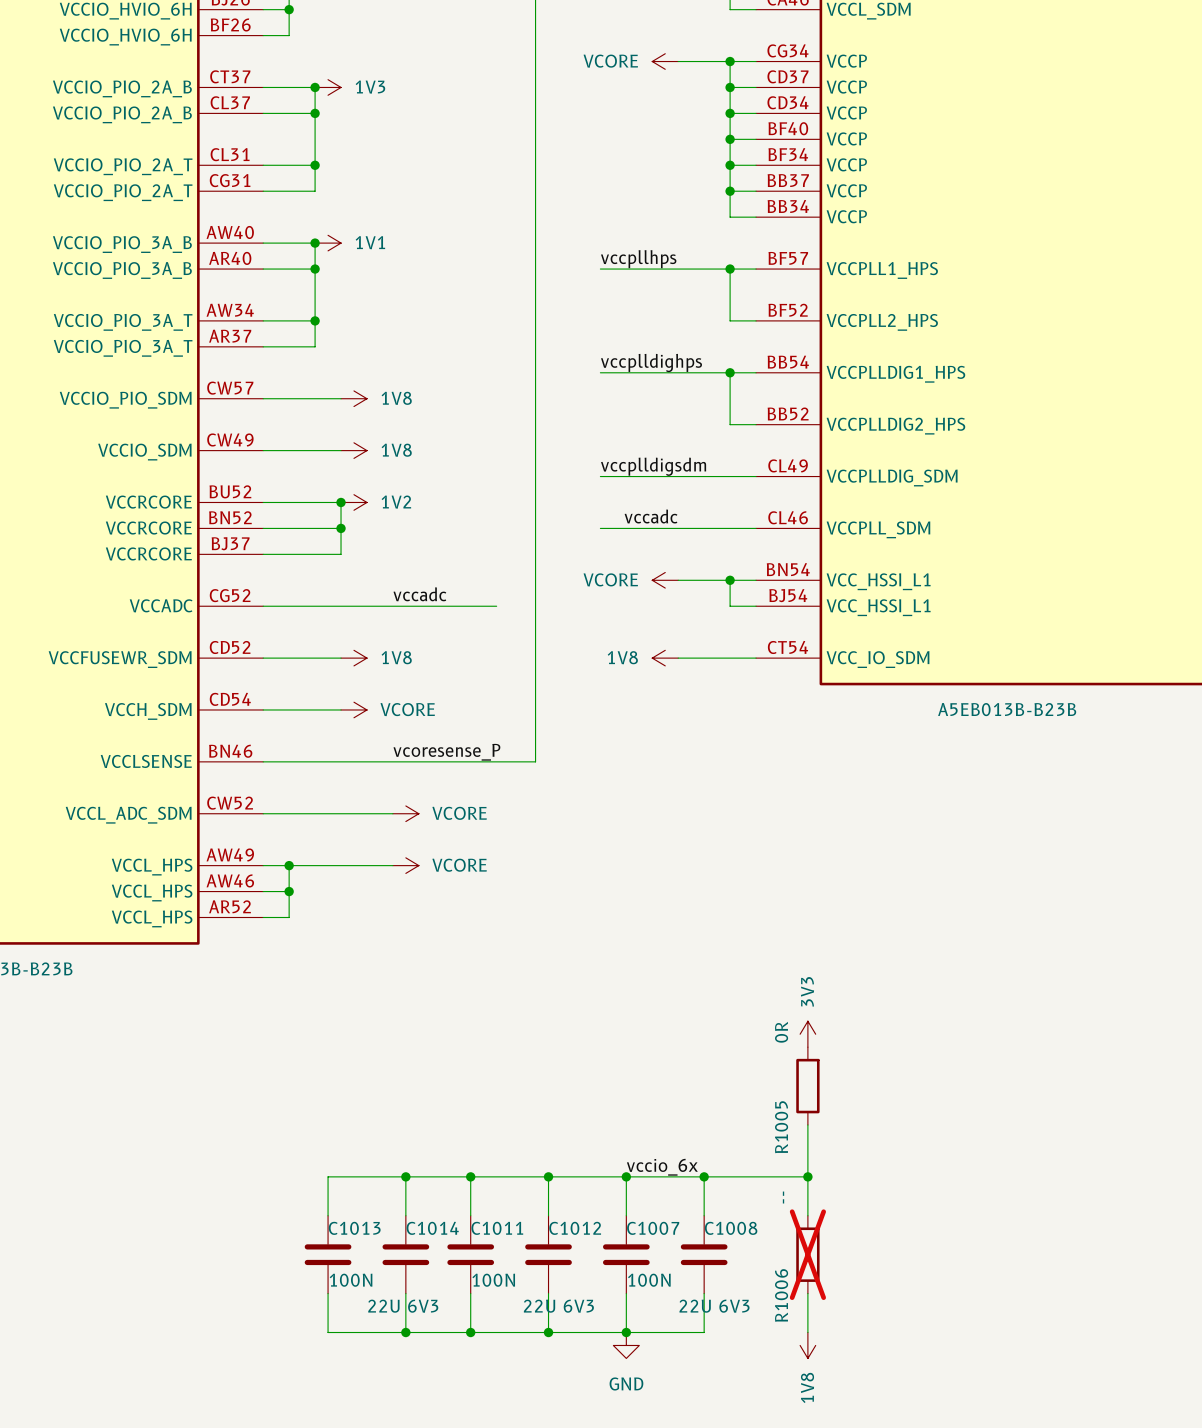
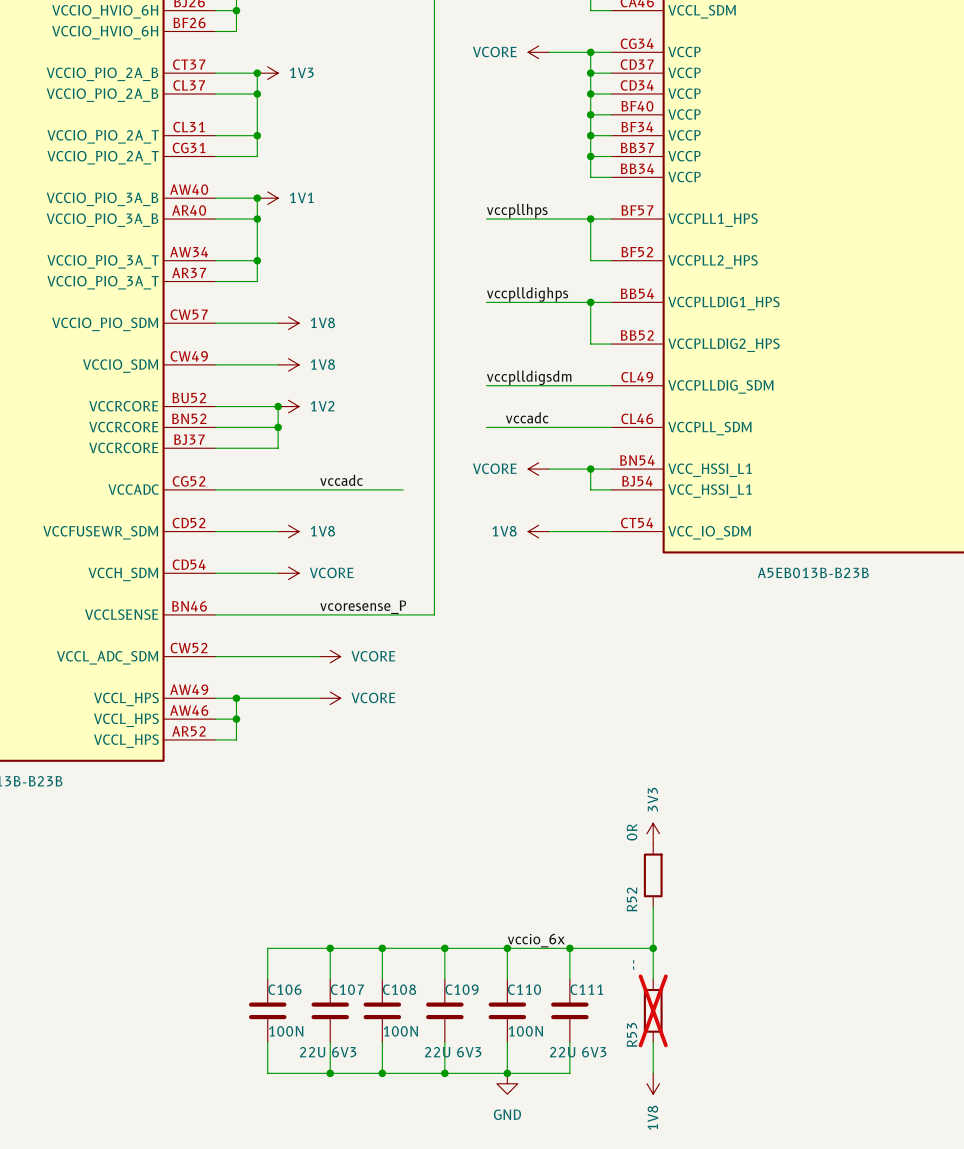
R1005 name: R1005 (781, 1127) -> R52 (632, 899)
C1013 name: C1013 (354, 1228) -> C106 (284, 989)
C1014 name: C1014 (432, 1228) -> C107 (347, 989)
C1011 name: C1011 (497, 1228) -> C108 (399, 989)
C1012 name: C1012 (575, 1228) -> C109 (462, 989)
C1007 name: C1007 (653, 1228) -> C110 (524, 989)
C1008 name: C1008 (731, 1228) -> C111 (586, 989)
R1006 name: R1006 (781, 1295) -> R53 (632, 1034)

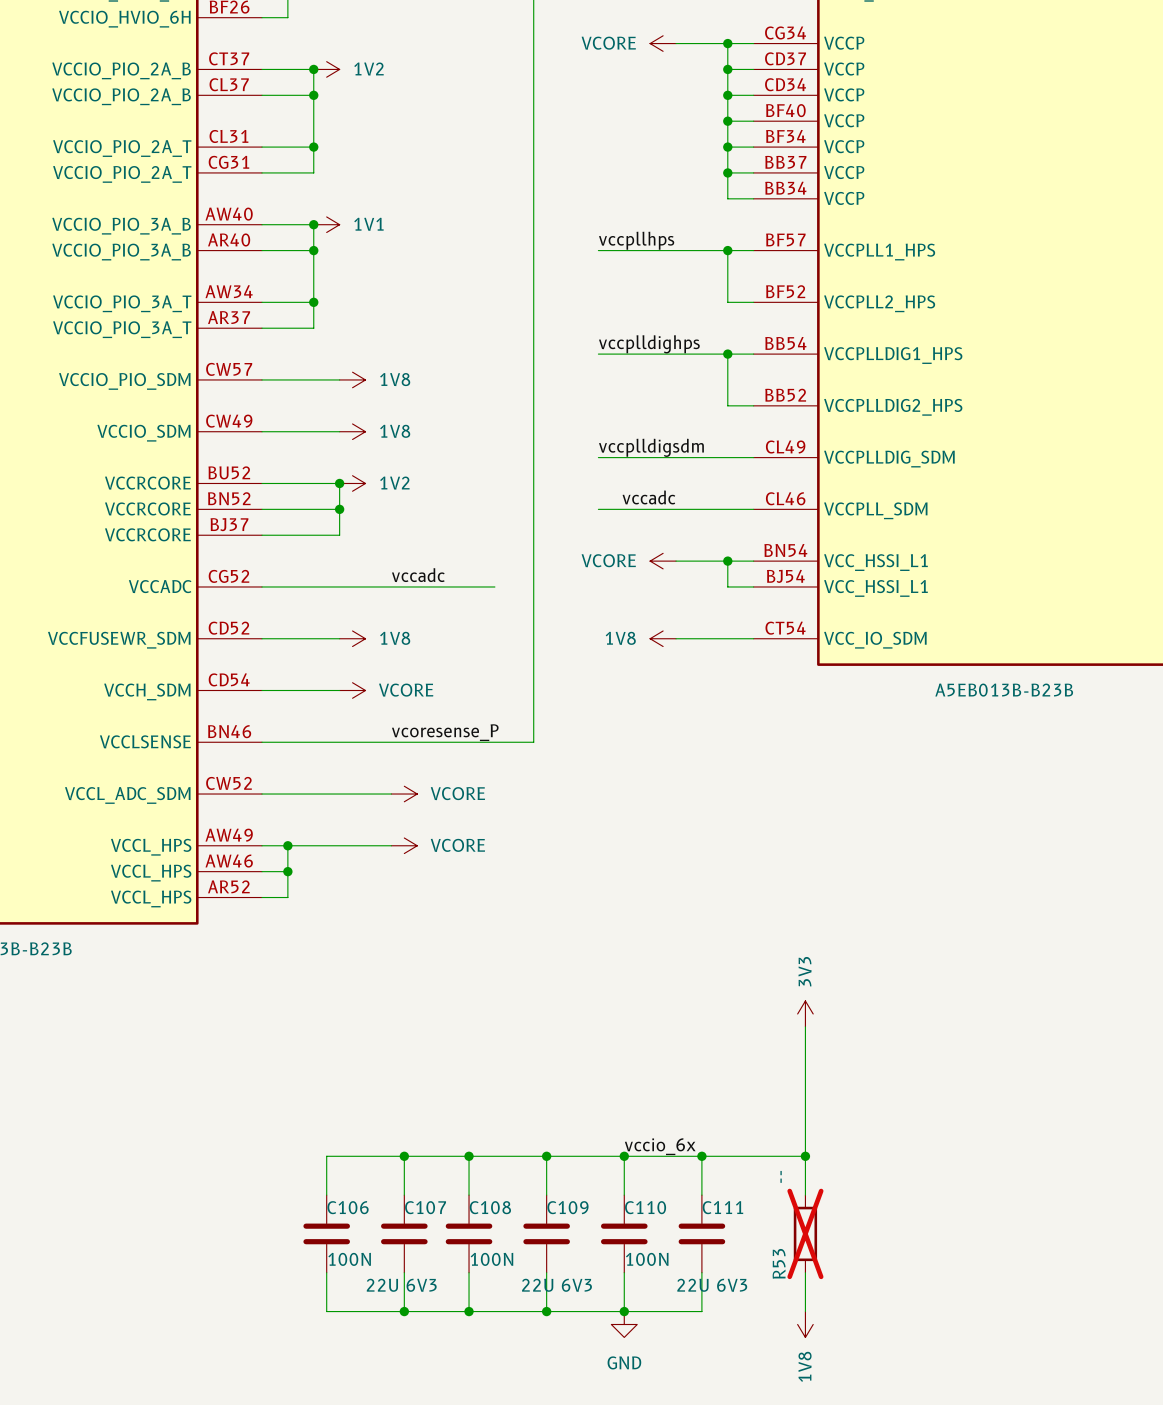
power symbol: 1V3 (267, 73) -> 1V2 (326, 69)
wire: none -> (805, 1026) (805, 1104)
R52: 0R (653, 875) -> none

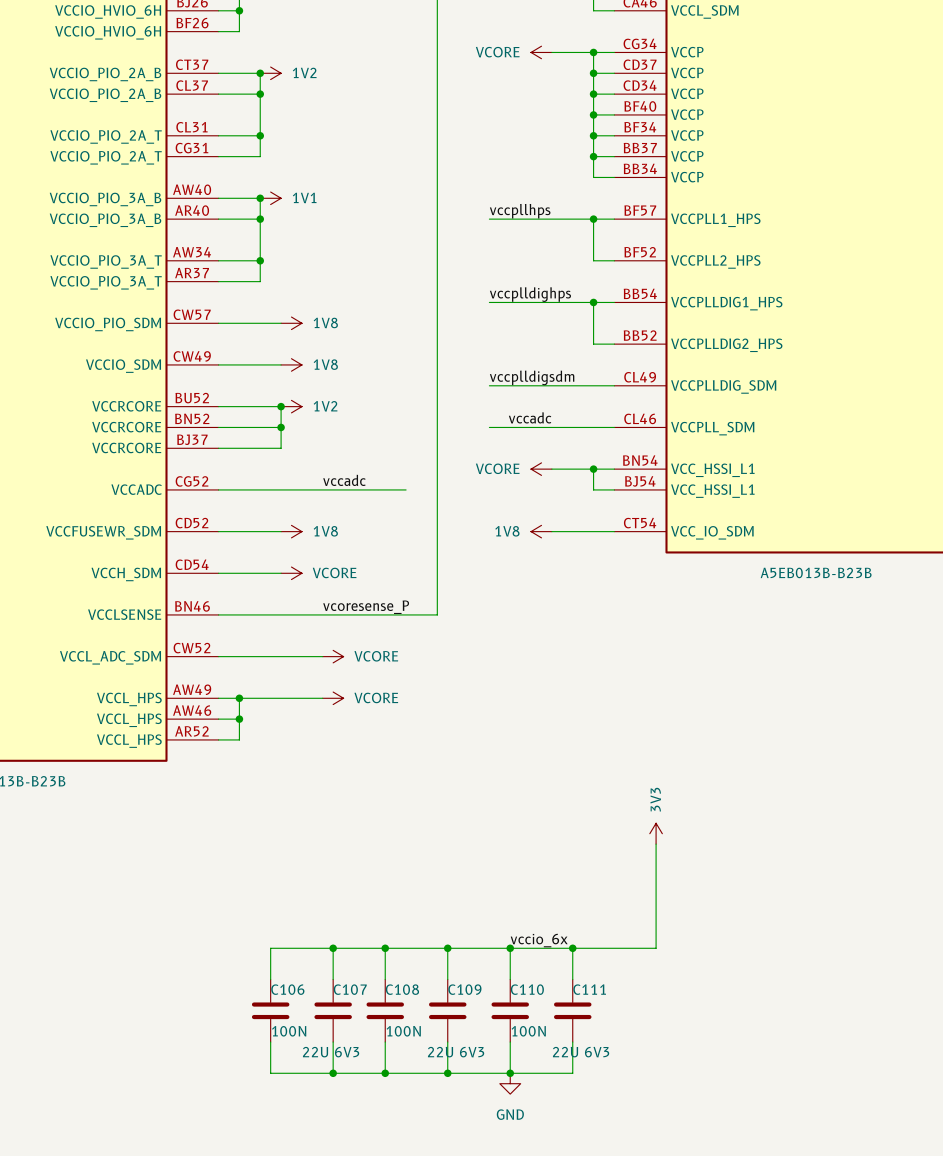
wire: (805, 1156) (805, 1195) -> none
junction: (805, 1156) -> none
R53: -- (805, 1233) -> none
wire: (805, 1272) (805, 1311) -> none
power symbol: 1V8 (805, 1324) -> none

